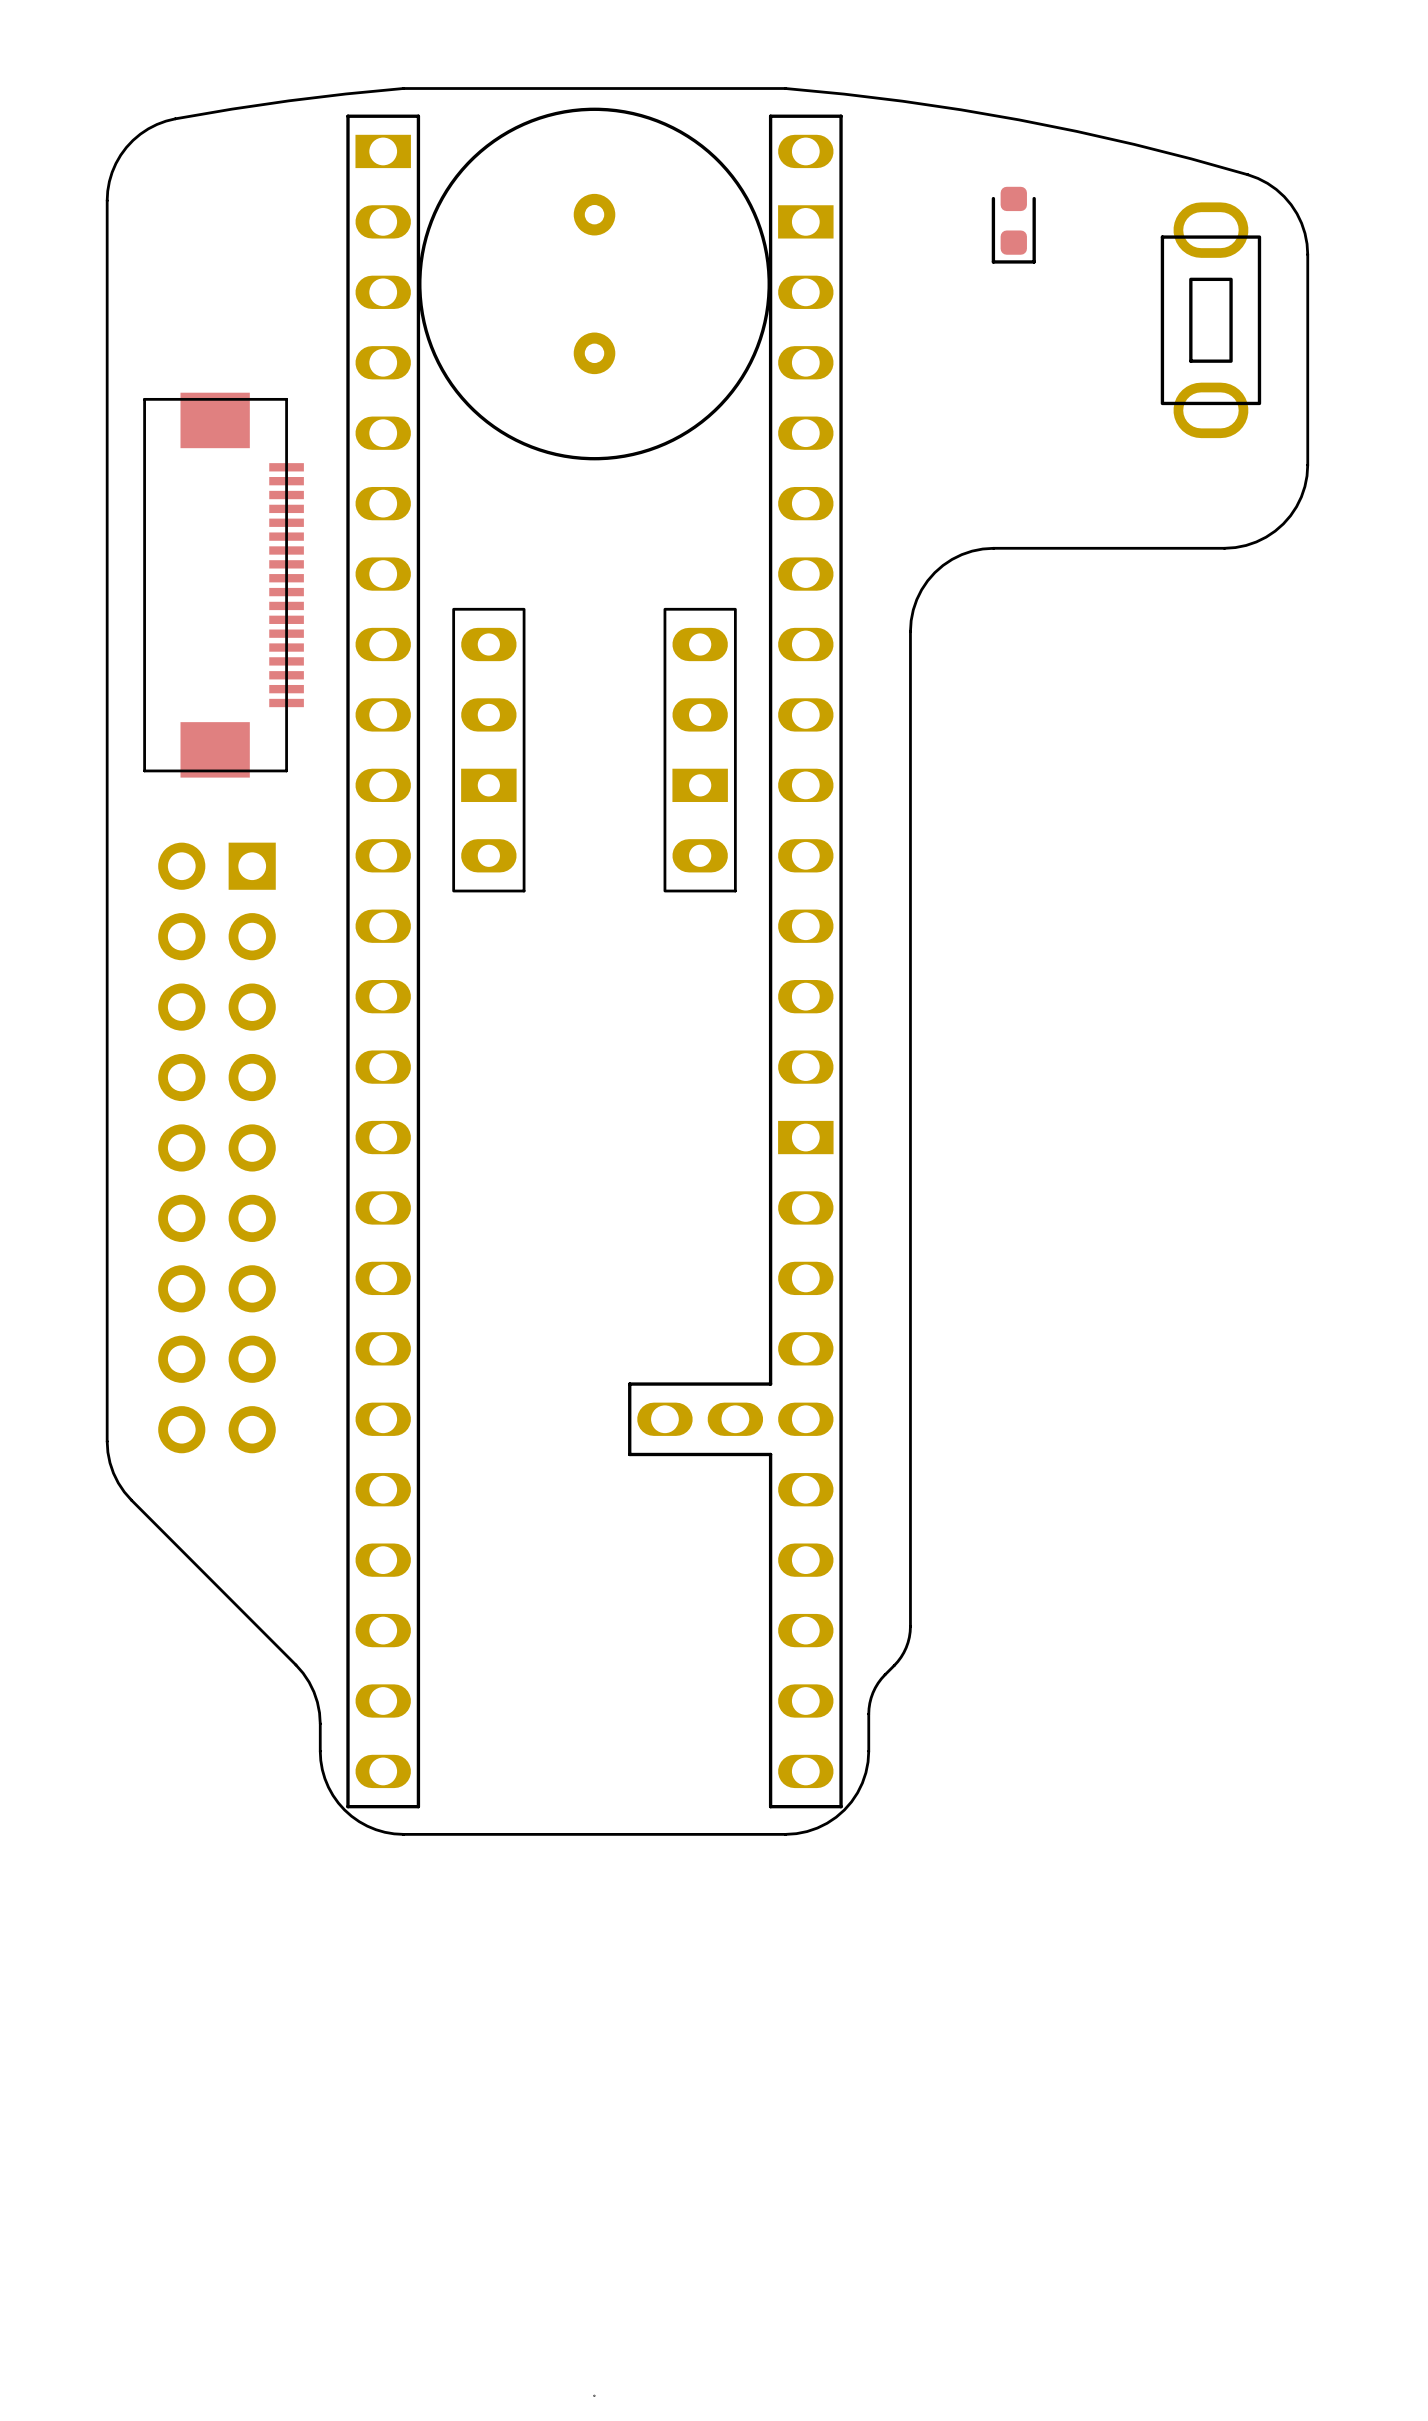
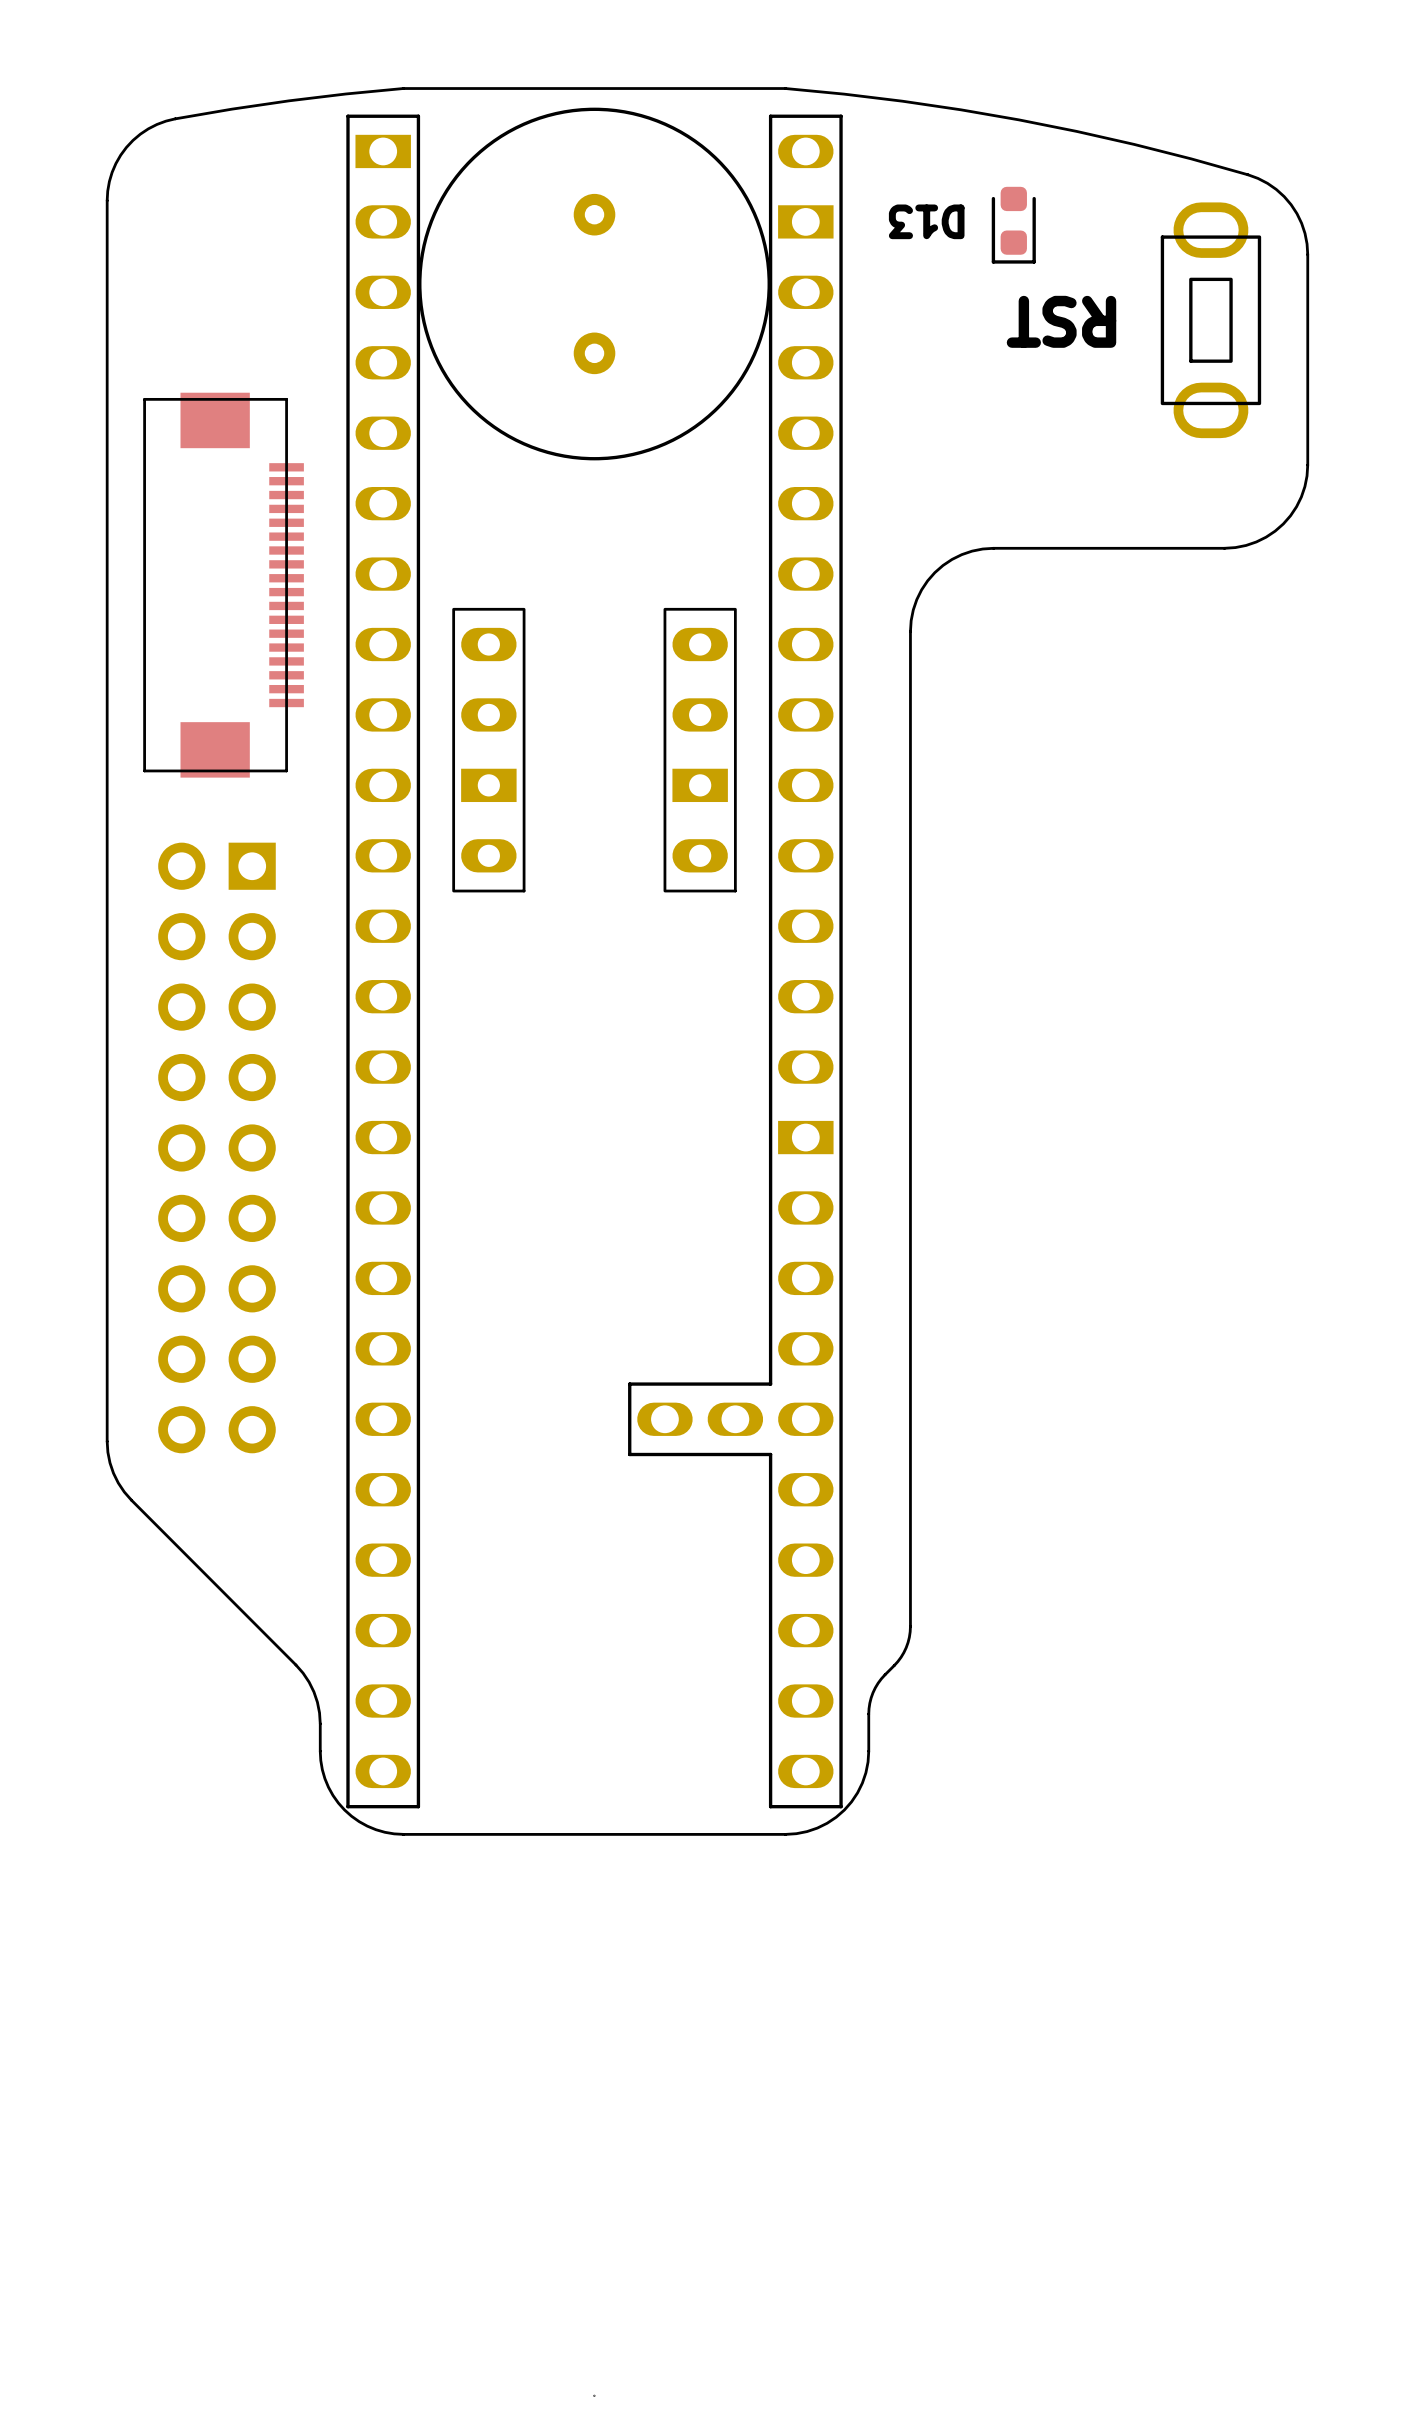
text: none -> D13 (926, 221)
text: none -> RST (1061, 321)

